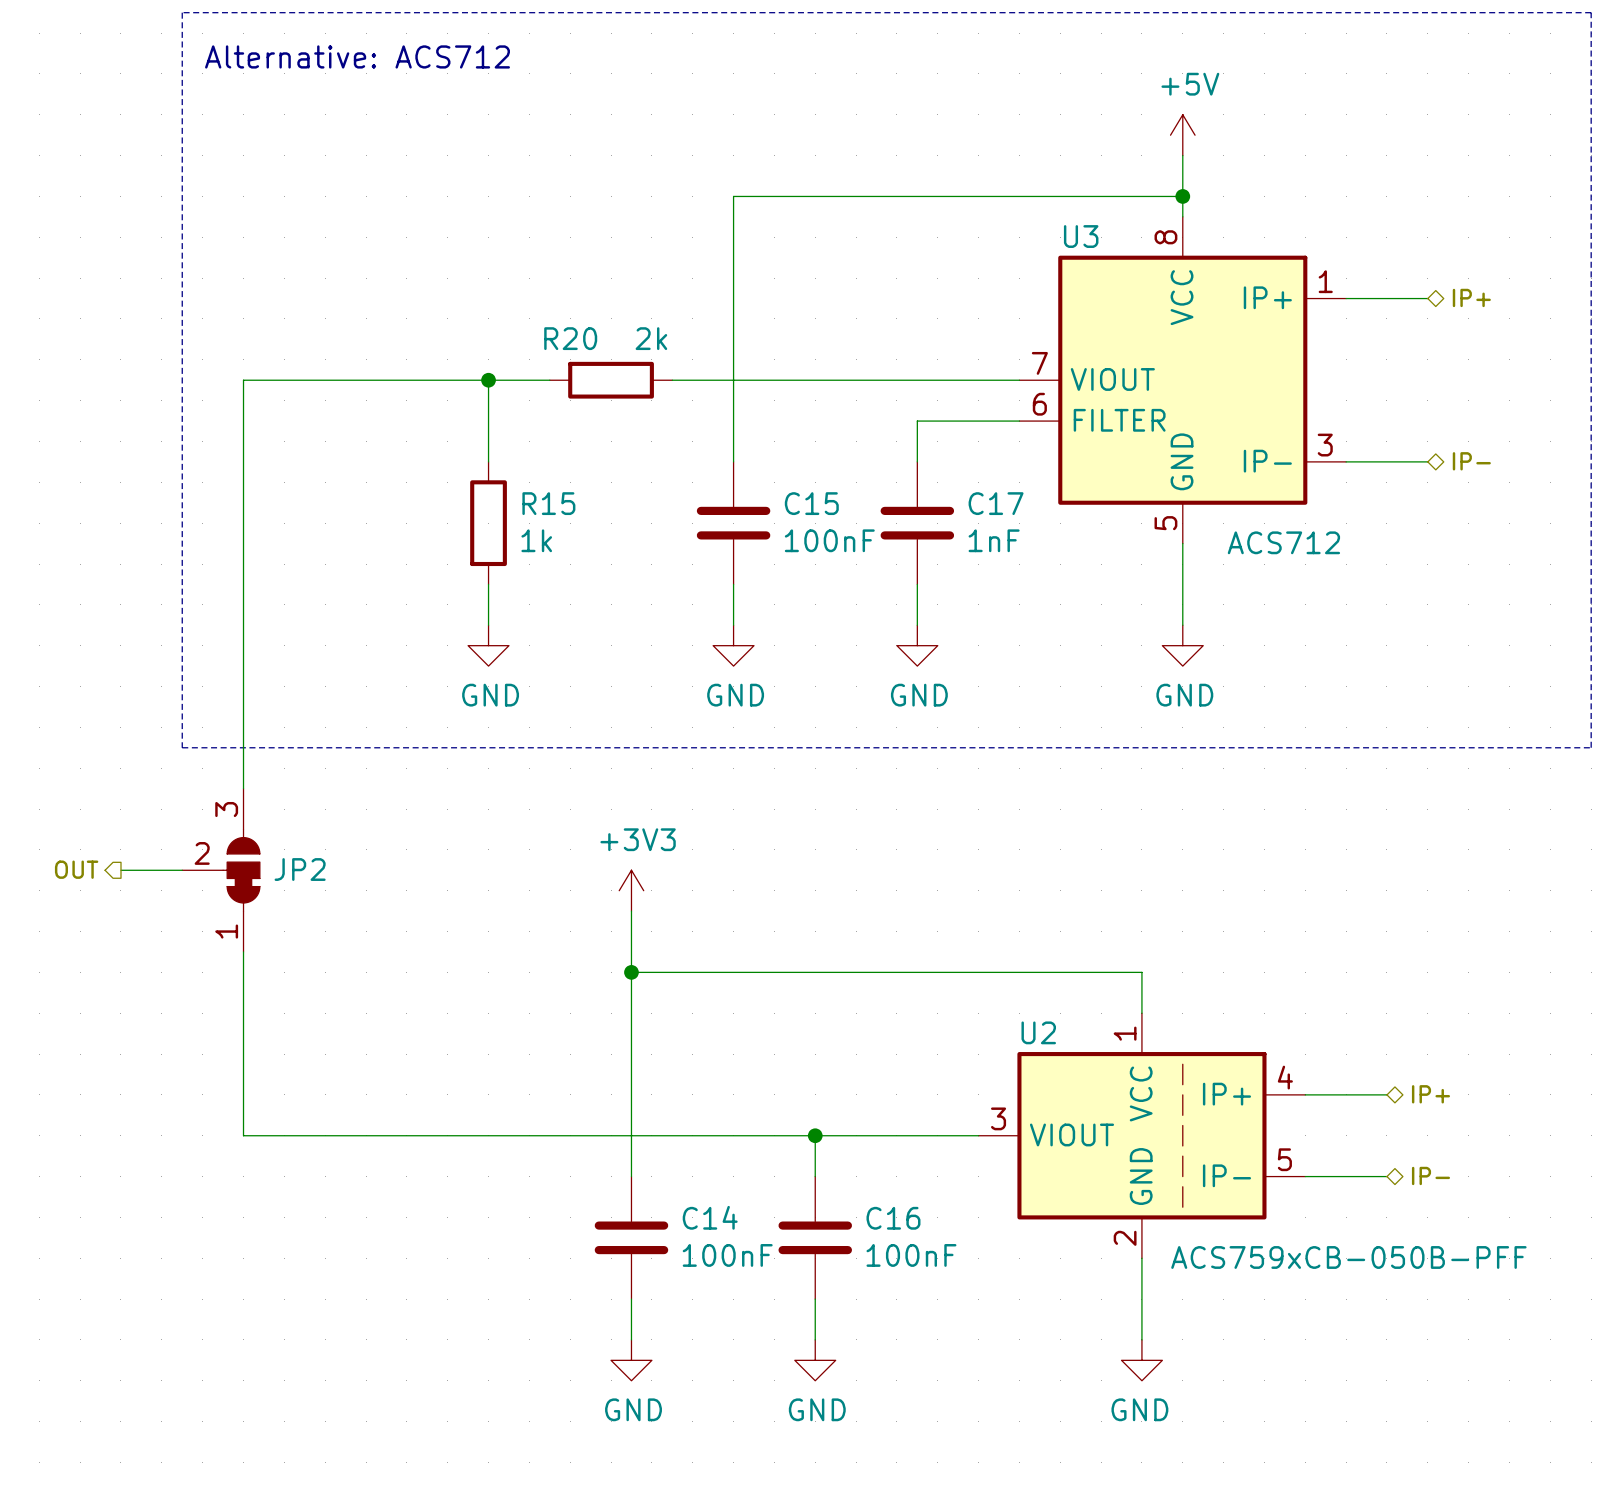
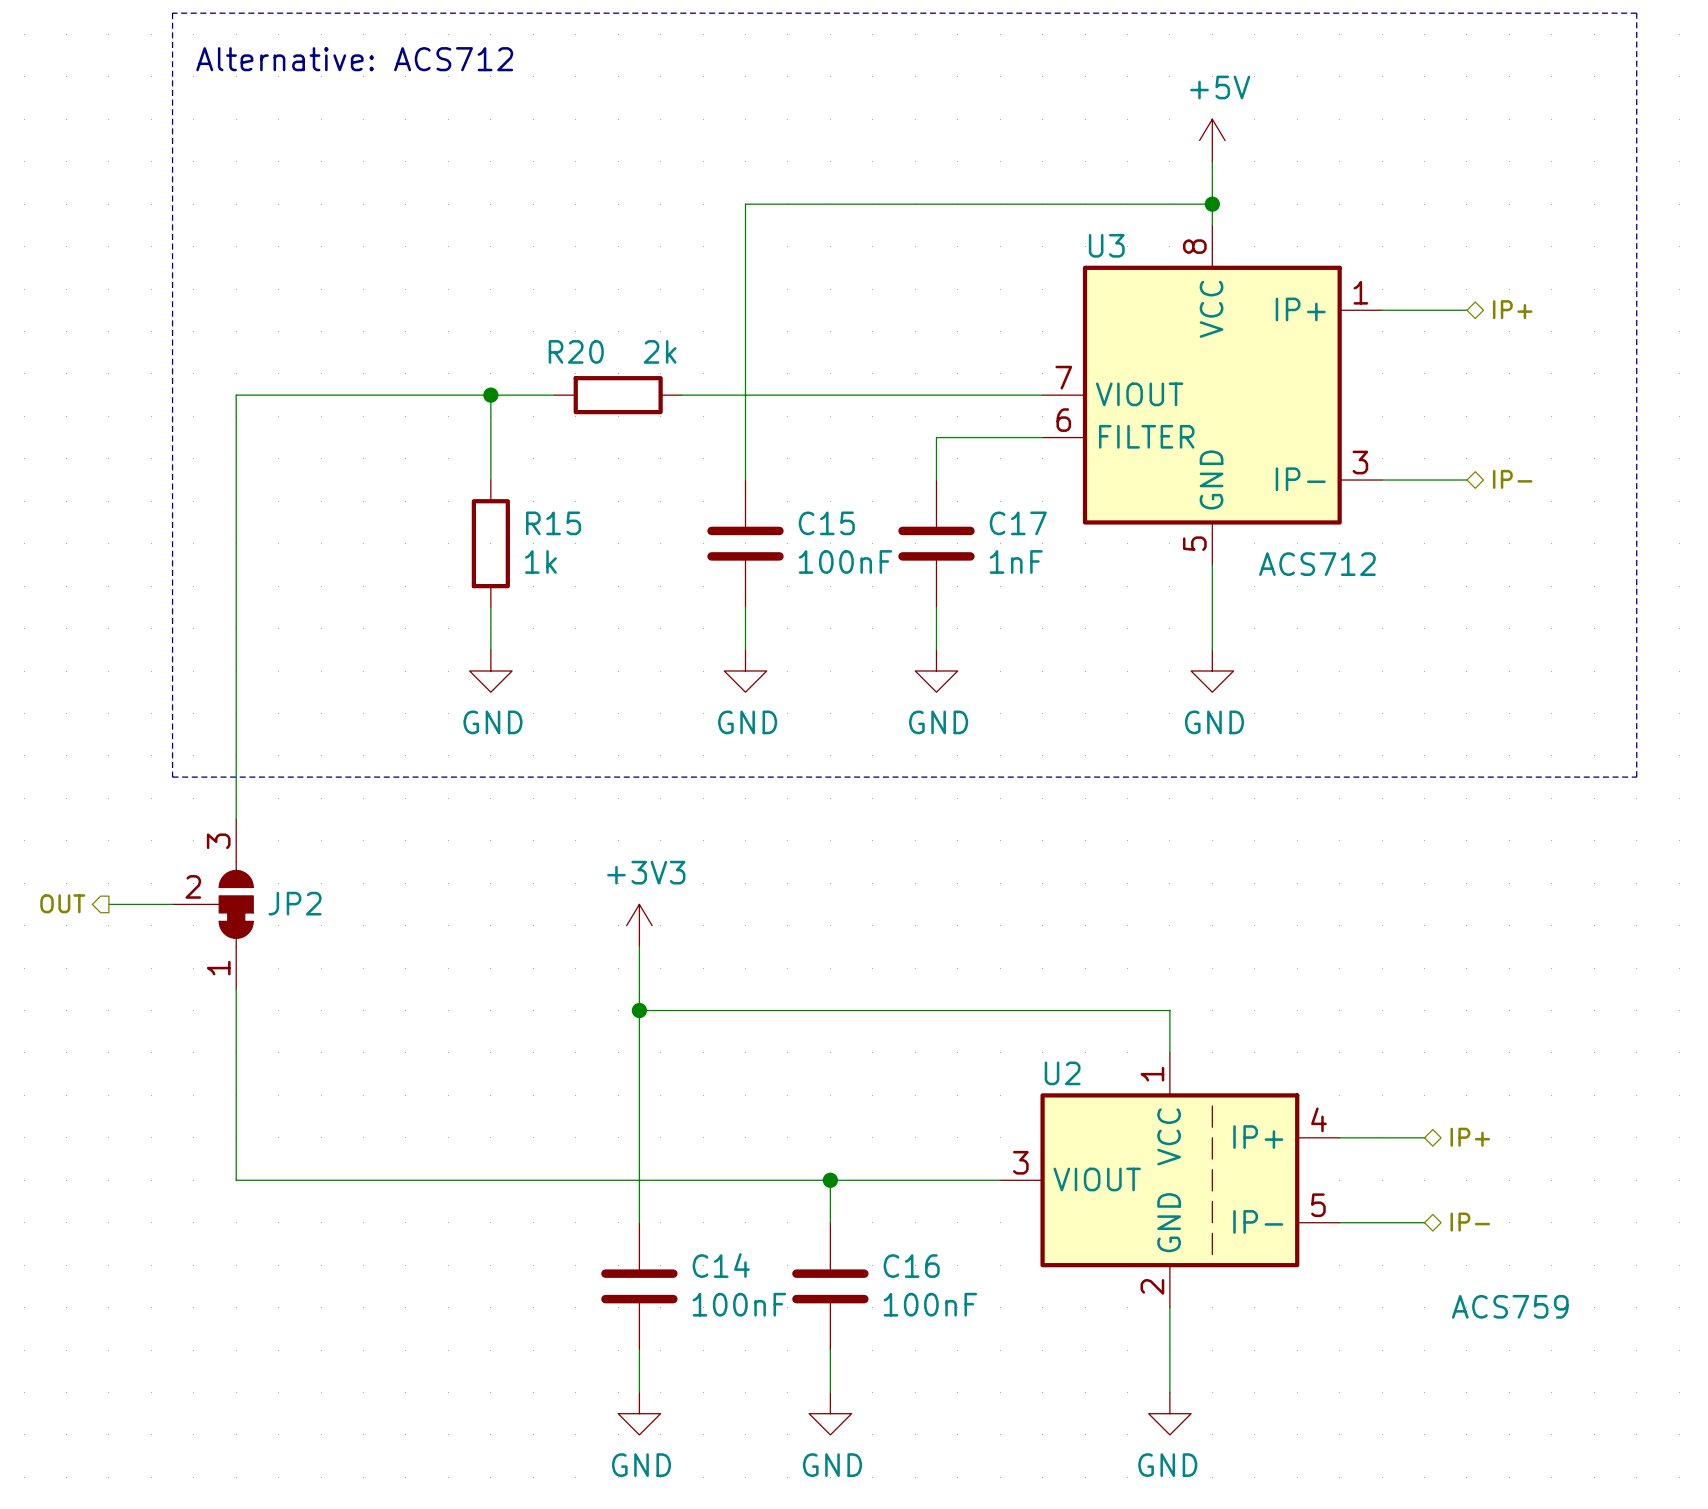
U2 value: ACS759xCB-050B-PFF (1348, 1257) -> ACS759 (1510, 1306)

